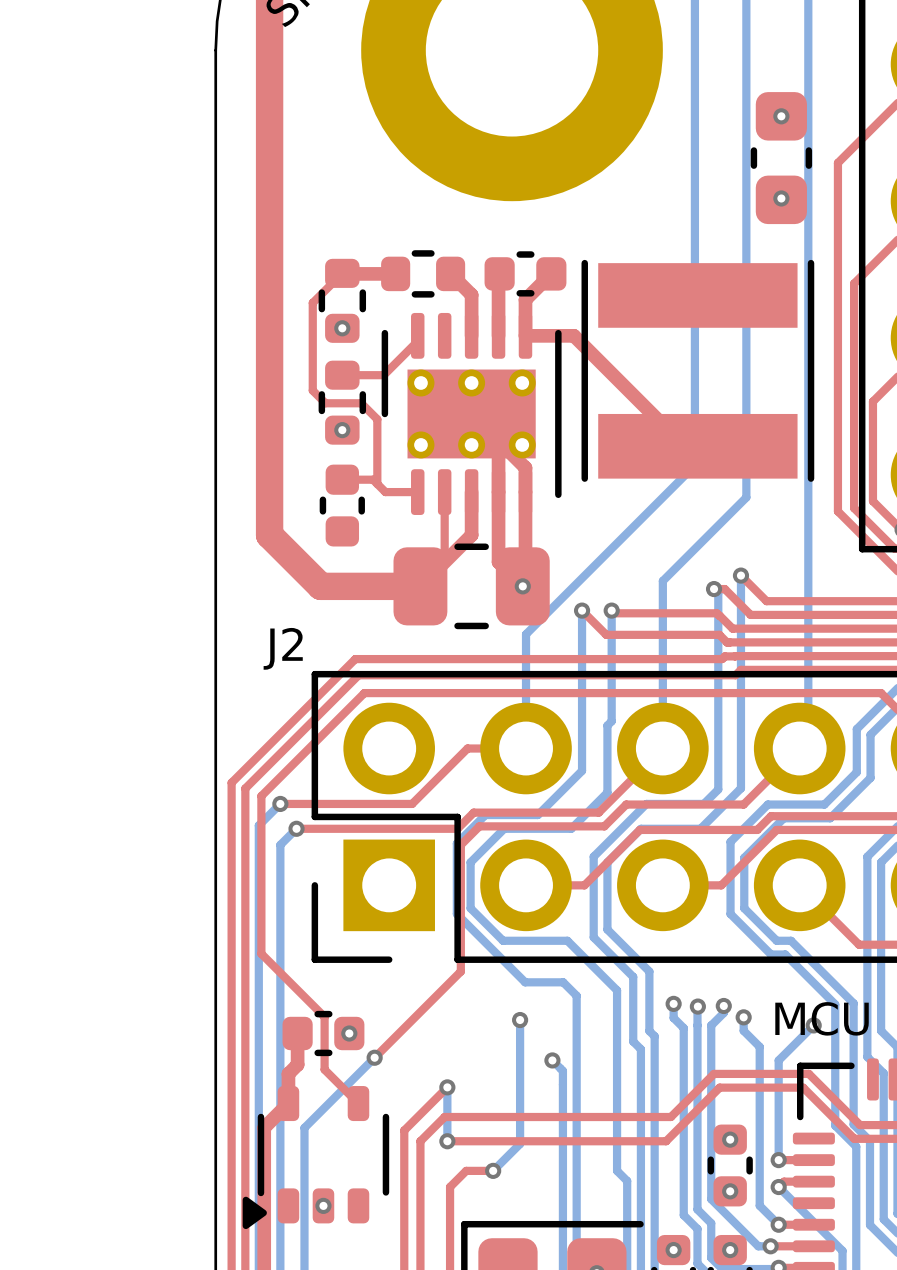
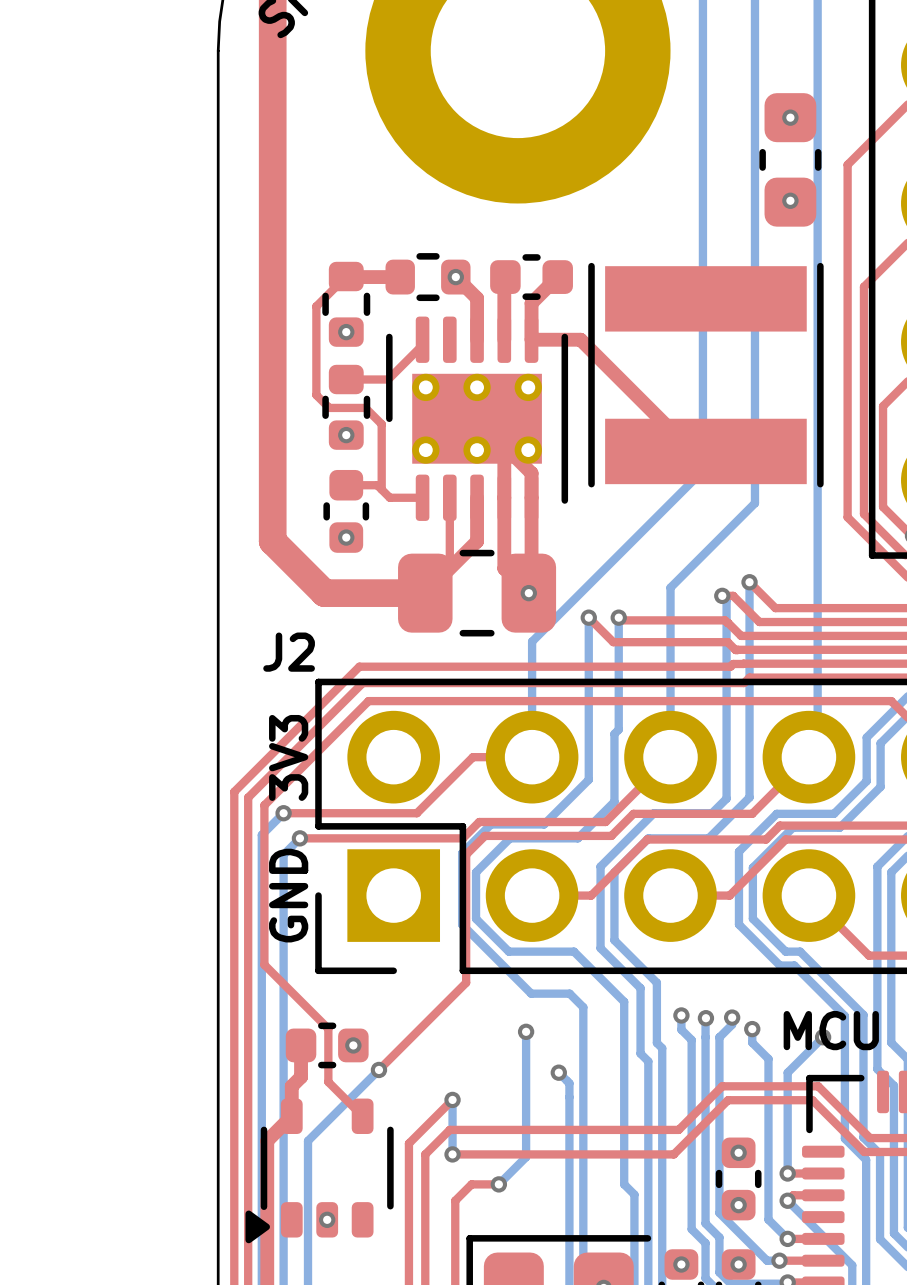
via: none -> (455, 277)
via: none -> (346, 537)
text: none -> 3V3 (288, 757)
text: none -> GND (288, 895)

